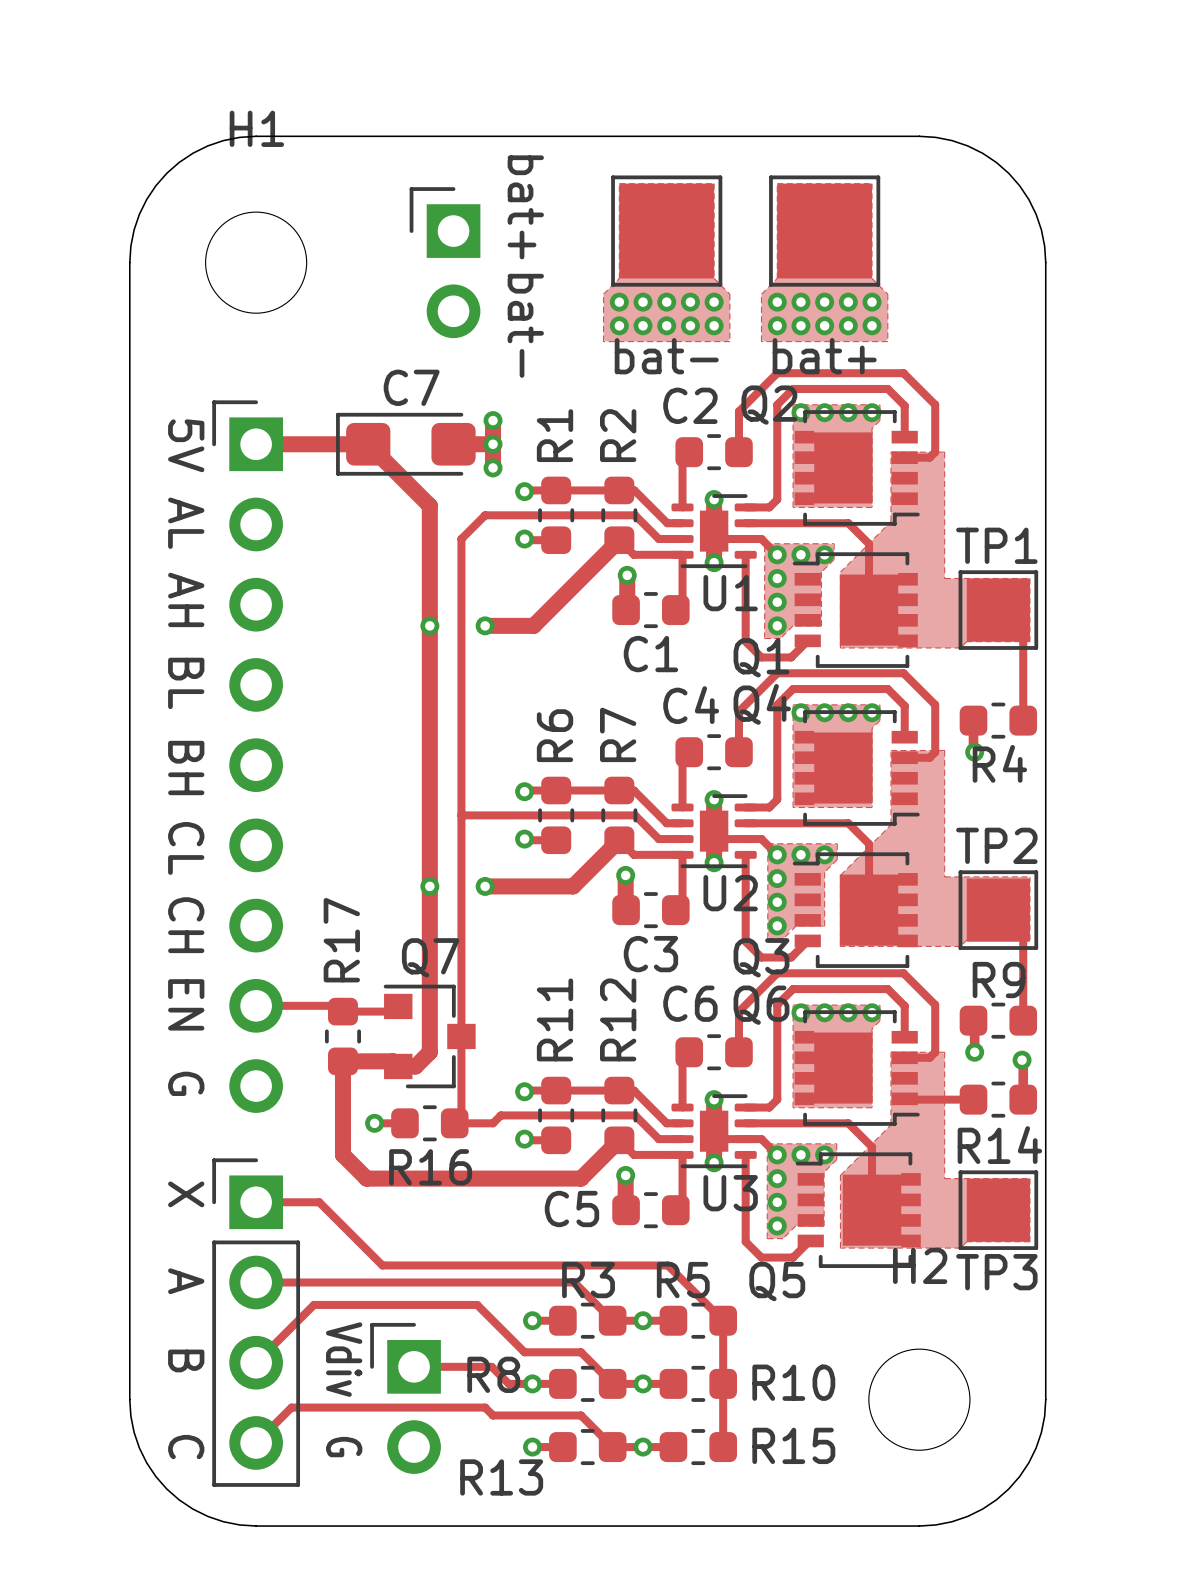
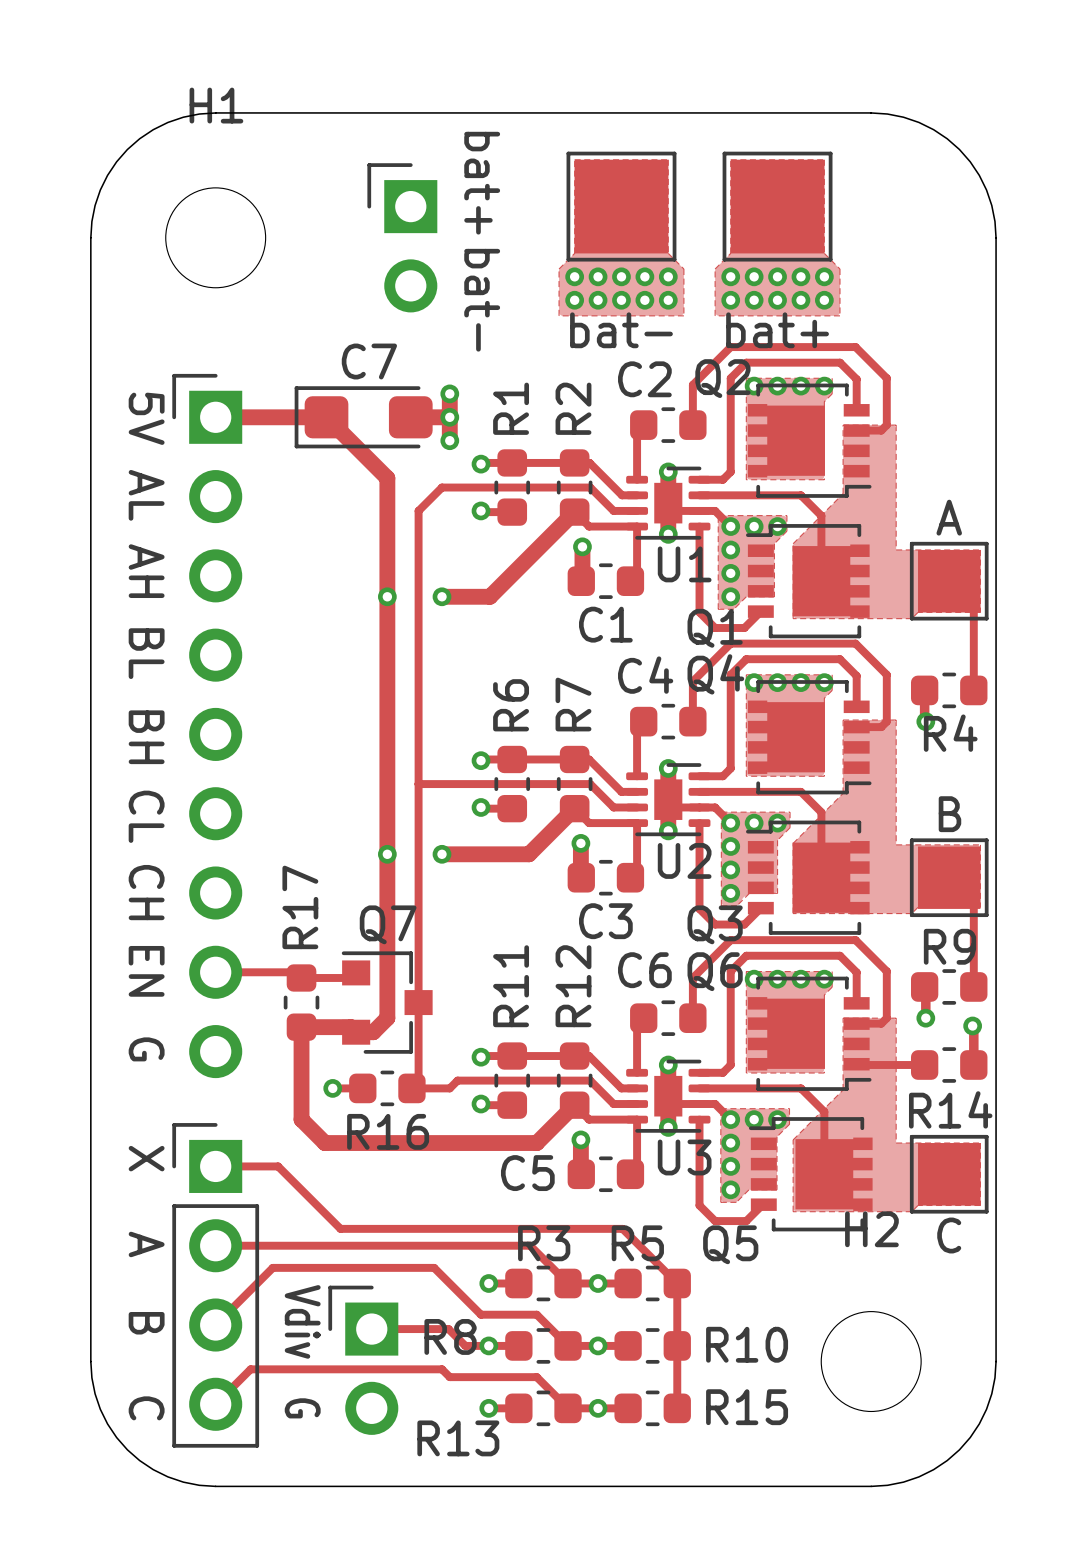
TP1 name: TP1 (996, 545) -> A (949, 517)
TP2 name: TP2 (996, 845) -> B (949, 814)
TP3 name: TP3 (996, 1272) -> C (949, 1235)

